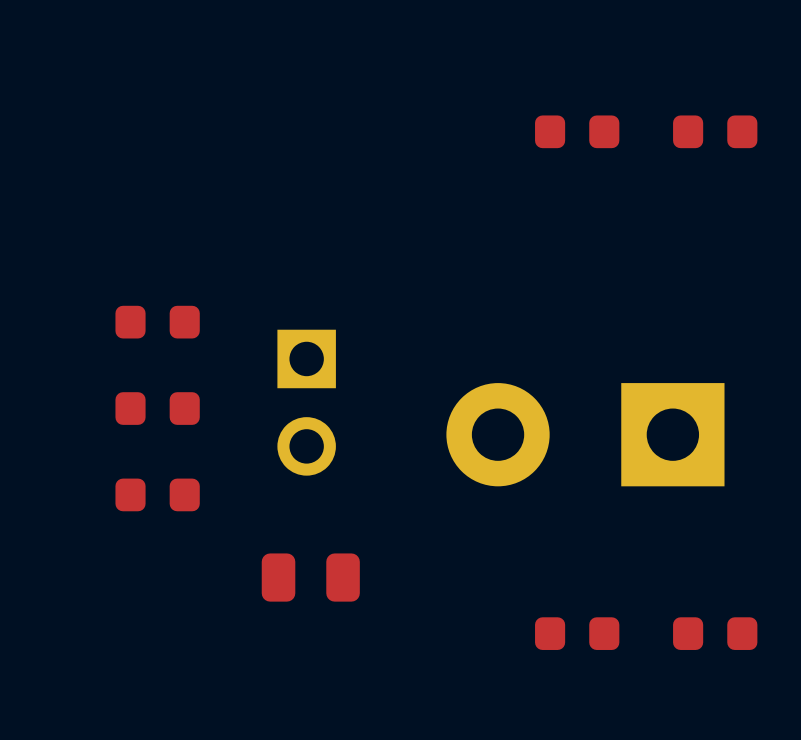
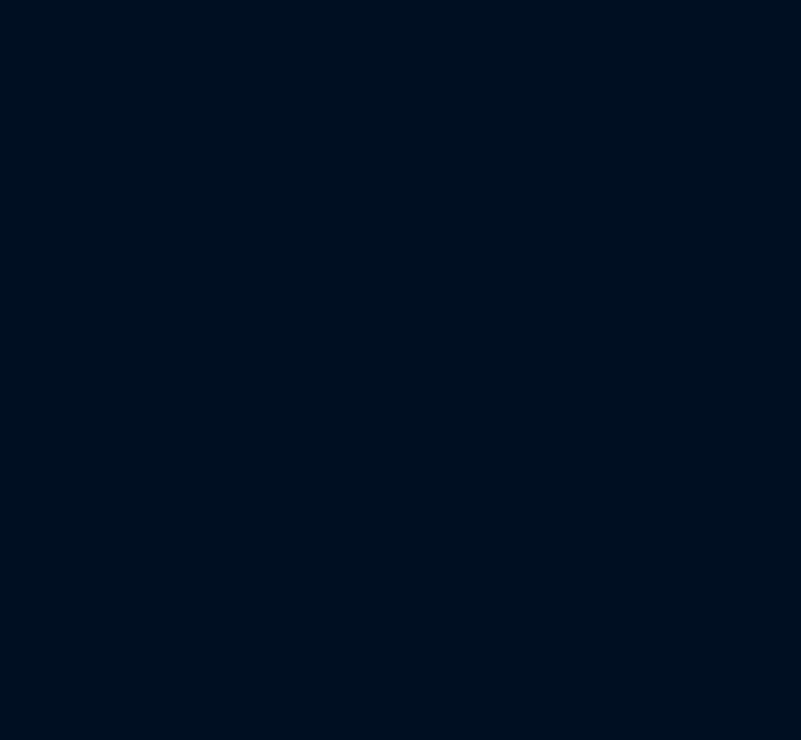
part: (577, 131) -> none
part: (715, 131) -> none
part: (157, 322) -> none
part: (306, 402) -> none
part: (157, 408) -> none
part: (585, 434) -> none
part: (157, 494) -> none
part: (310, 577) -> none
part: (577, 633) -> none
part: (715, 633) -> none

